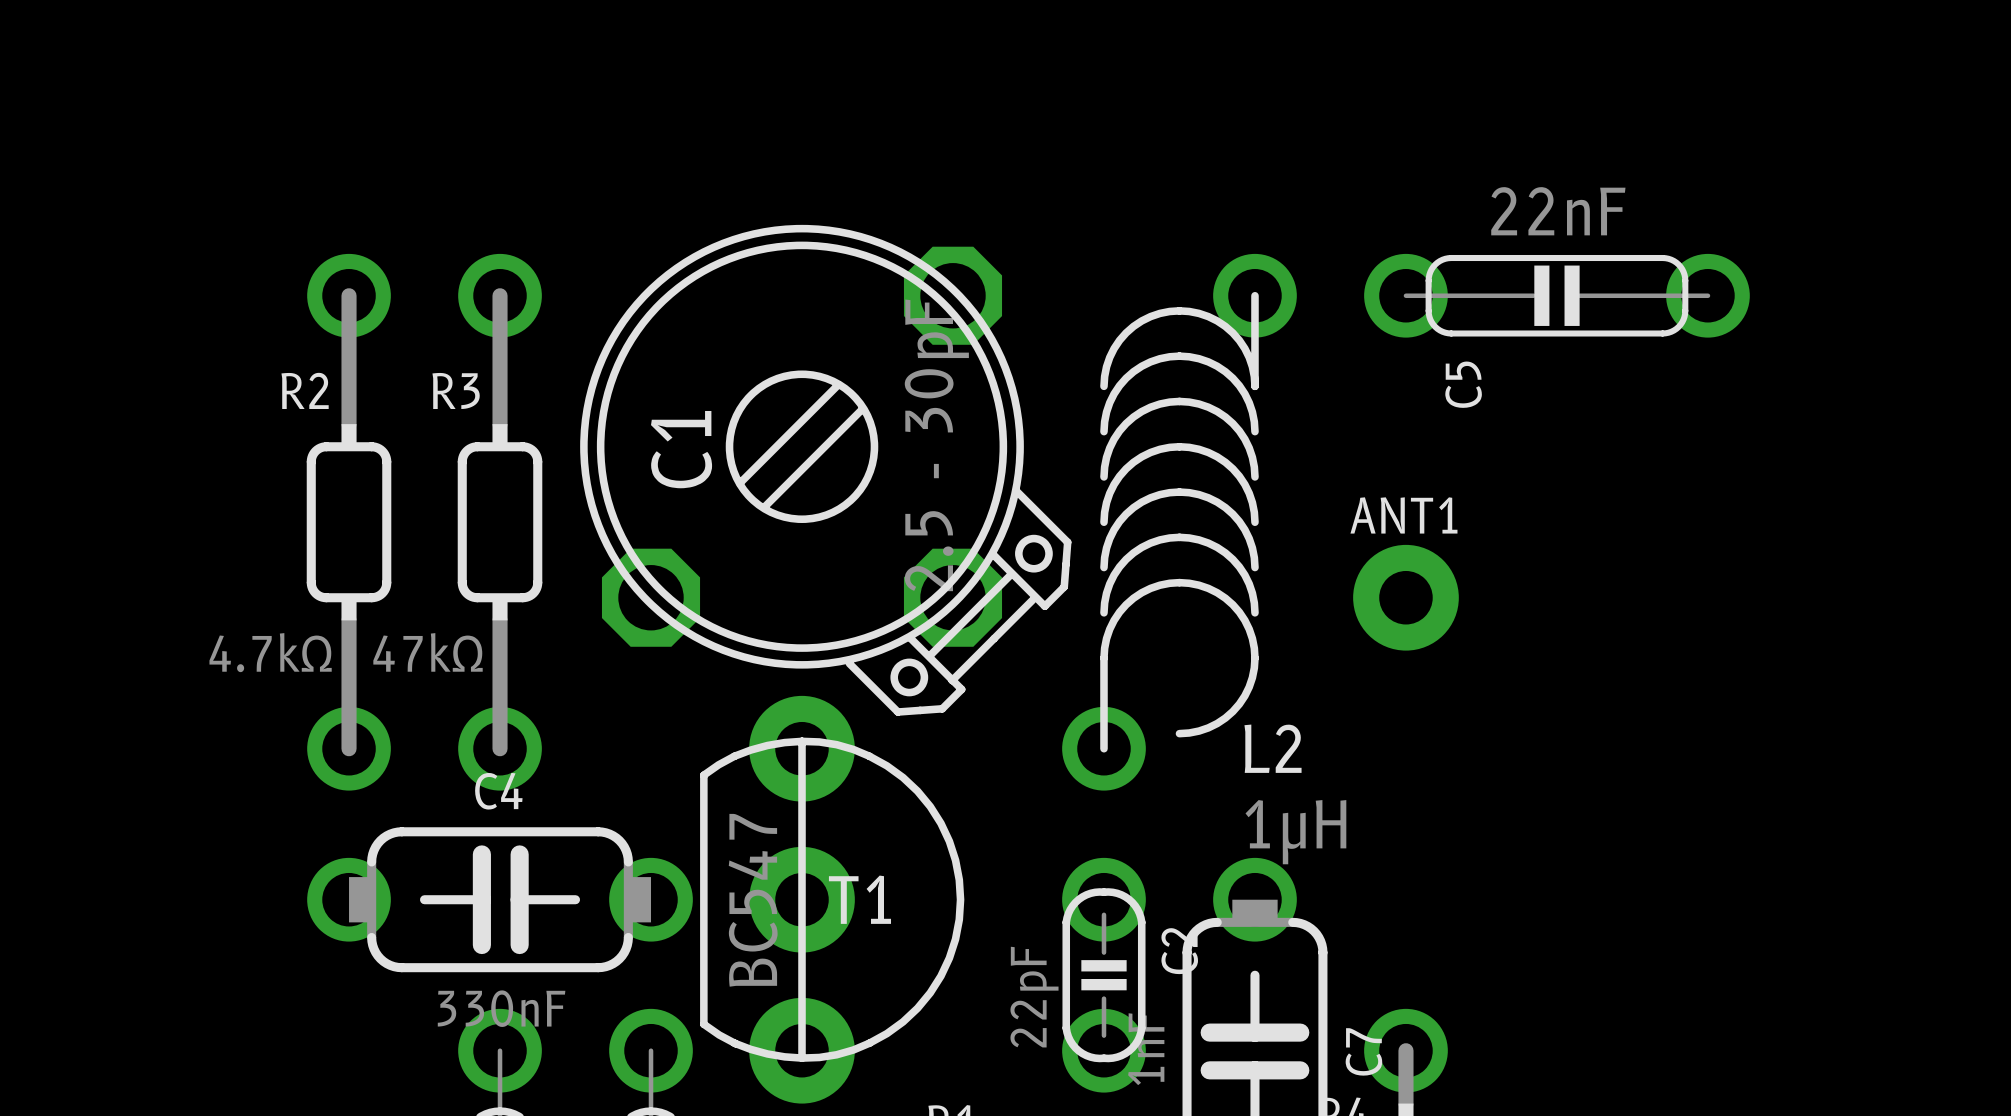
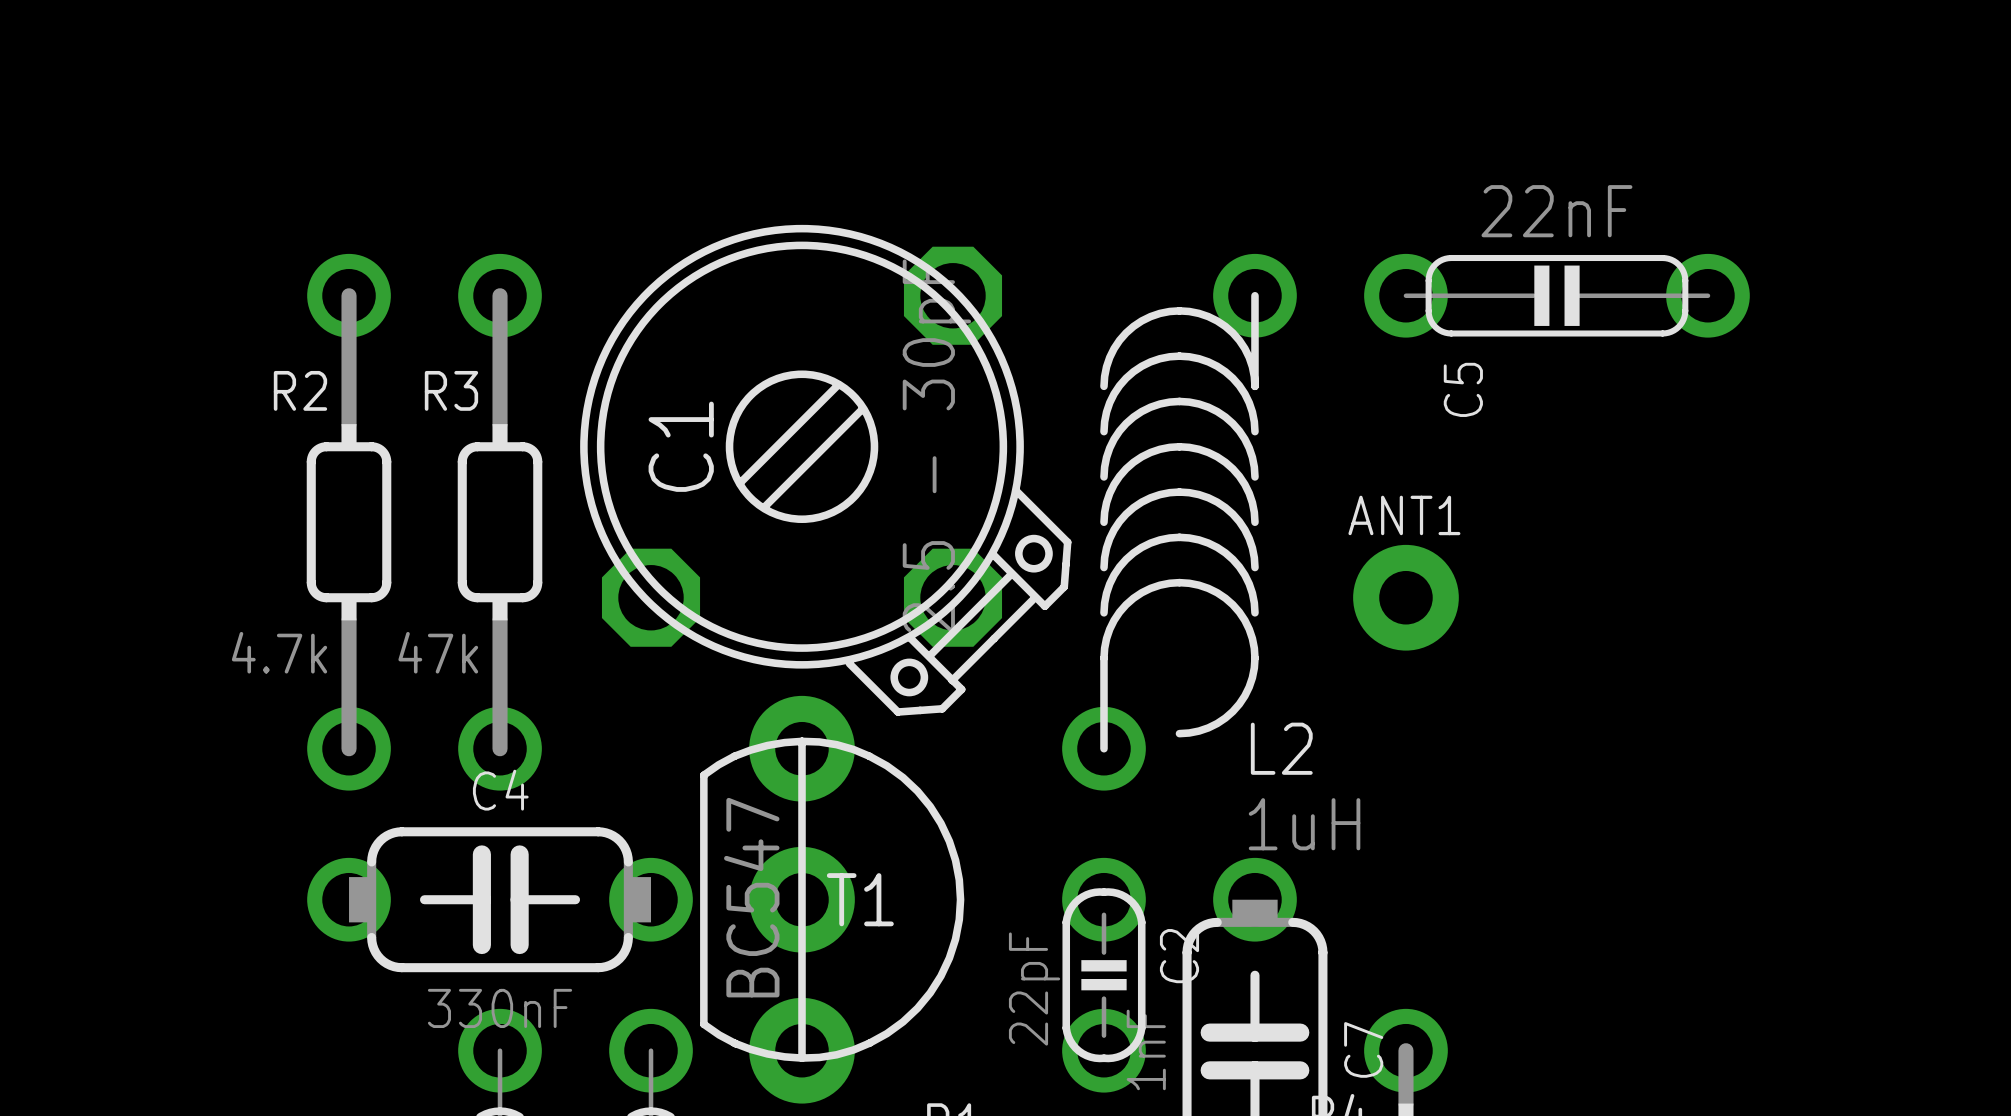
R2 value: 4.7kΩ (270, 652) -> 4.7k (279, 652)
R3 value: 47kΩ (428, 652) -> 47k (438, 652)
L2 value: 1μH (1295, 832) -> 1uH (1304, 824)

